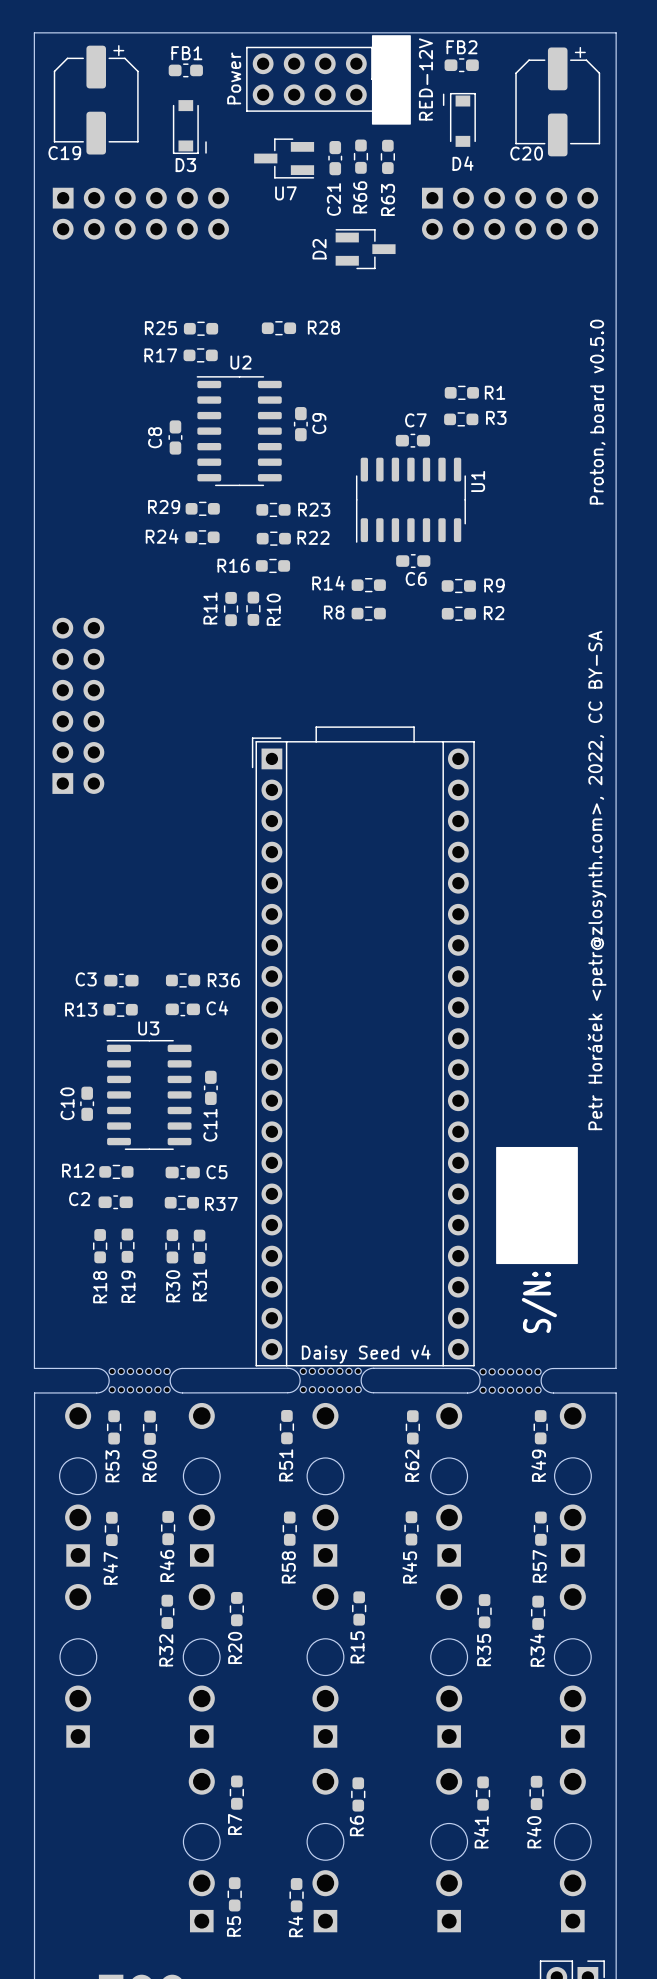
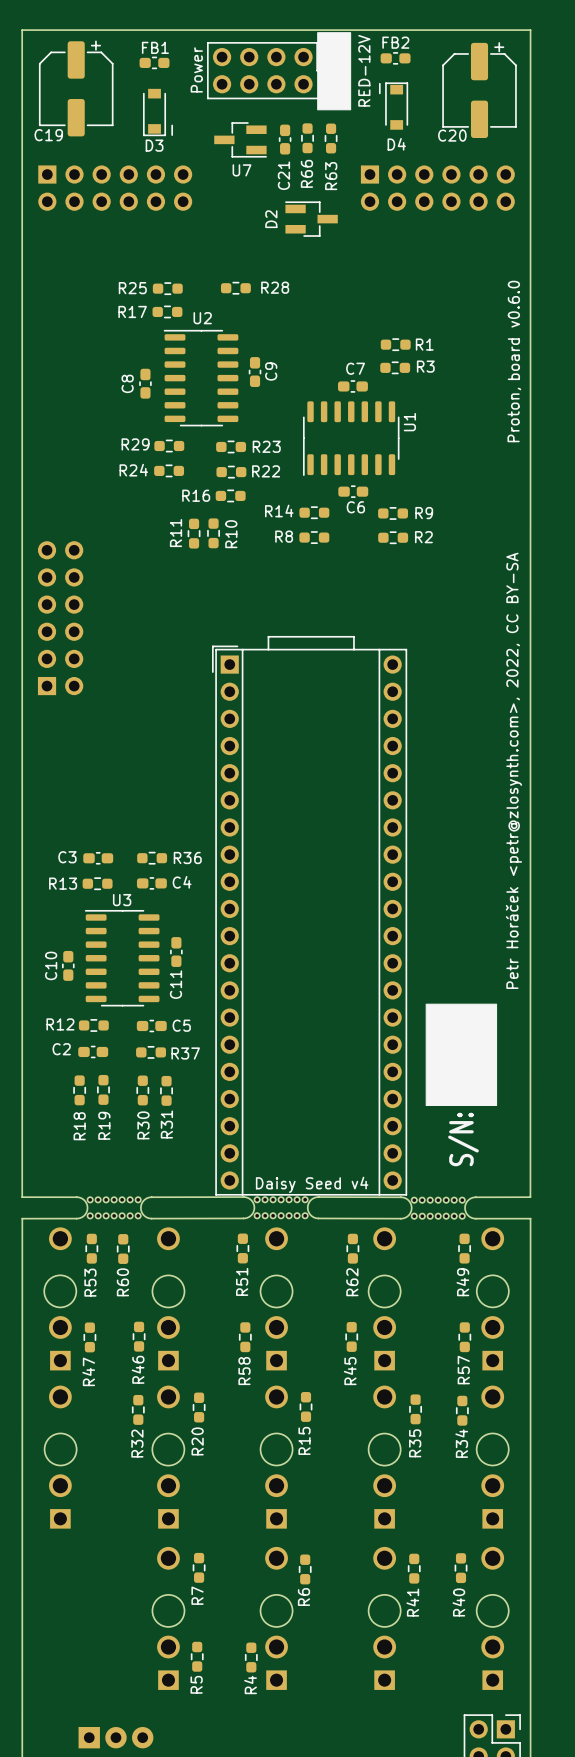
text: board v0.5.0 (597, 376) -> board v0.6.0 (513, 330)

